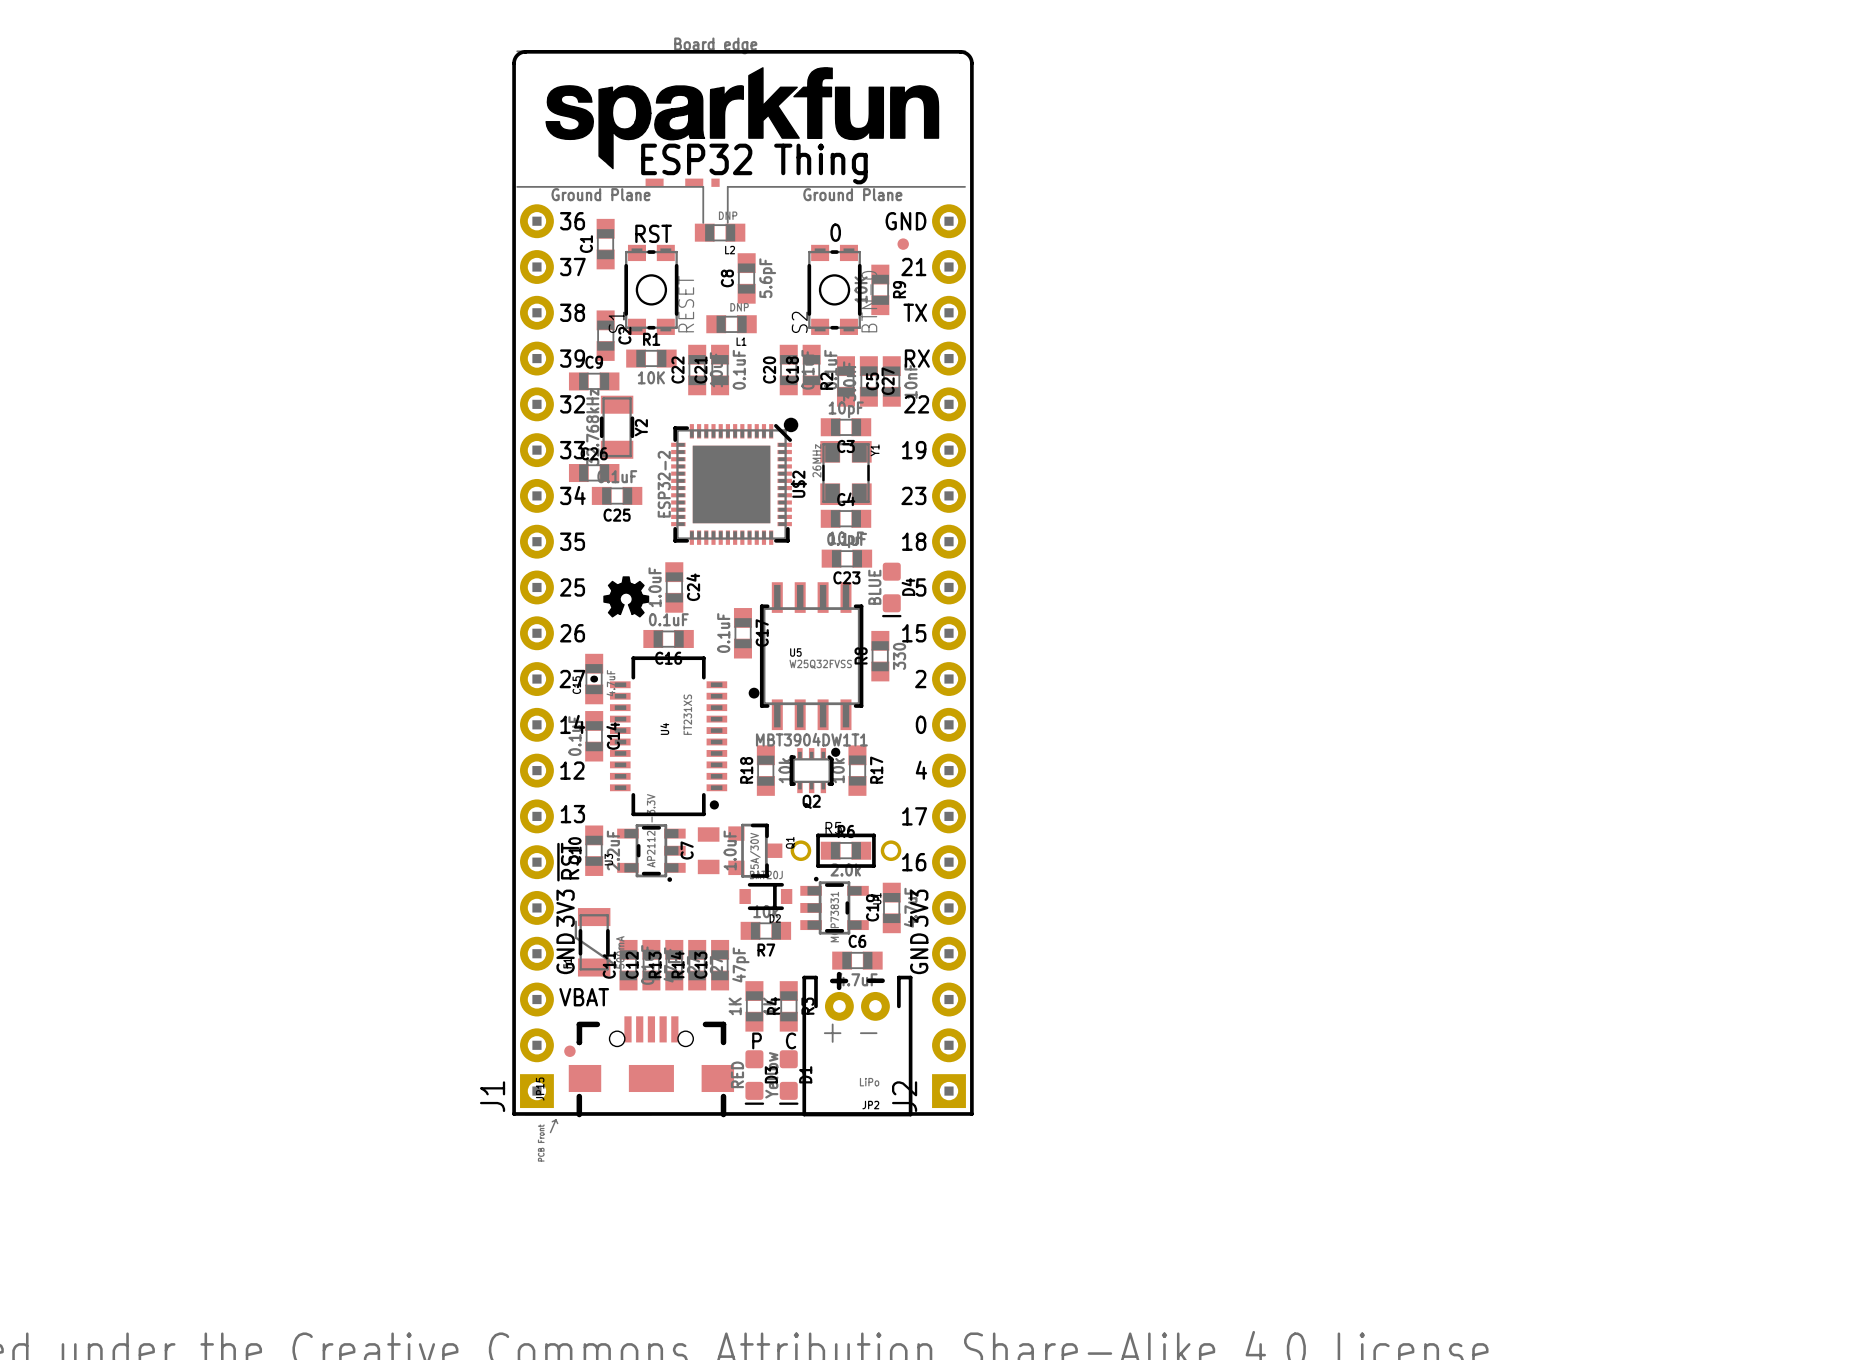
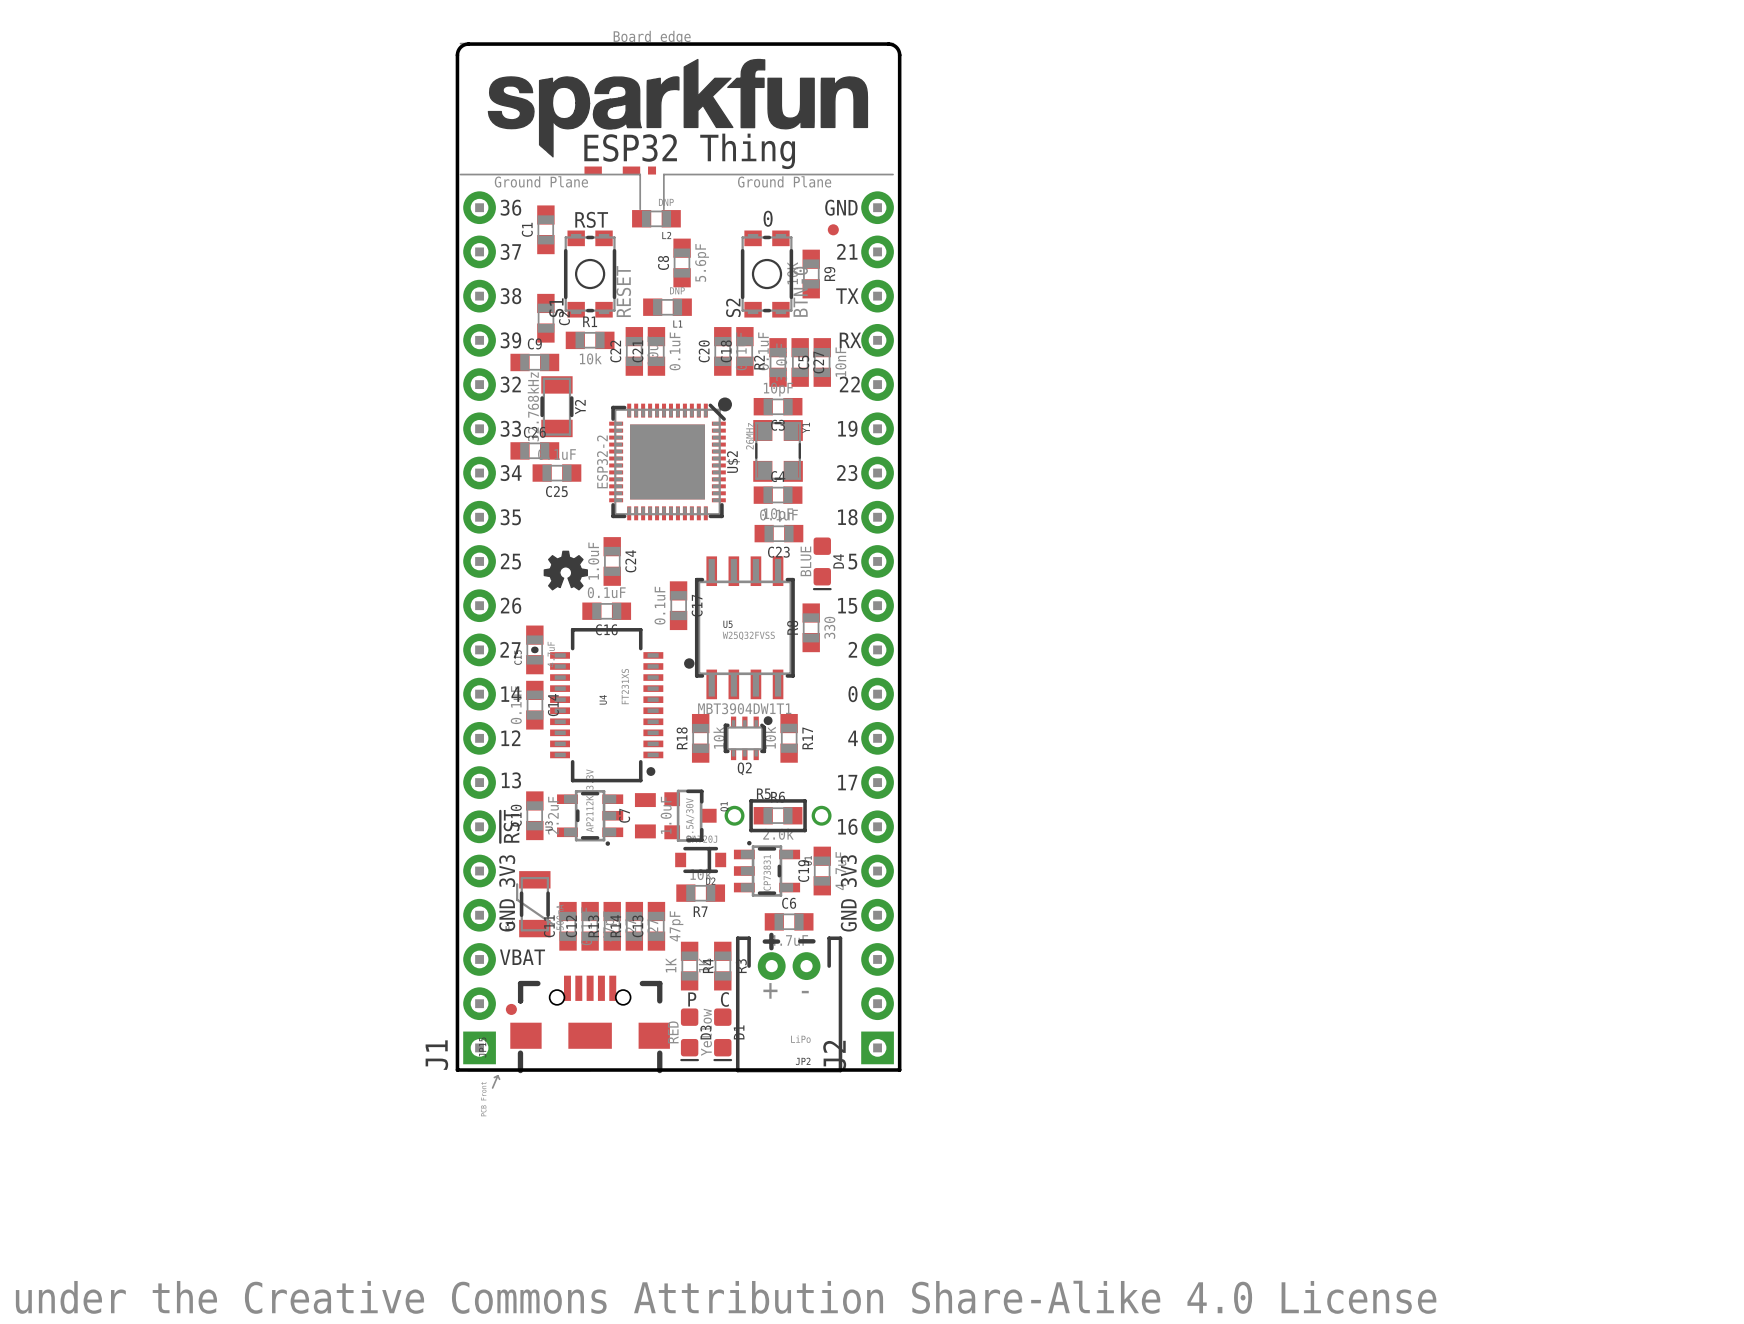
R1 value: 10K (651, 377) -> 10k (590, 358)

